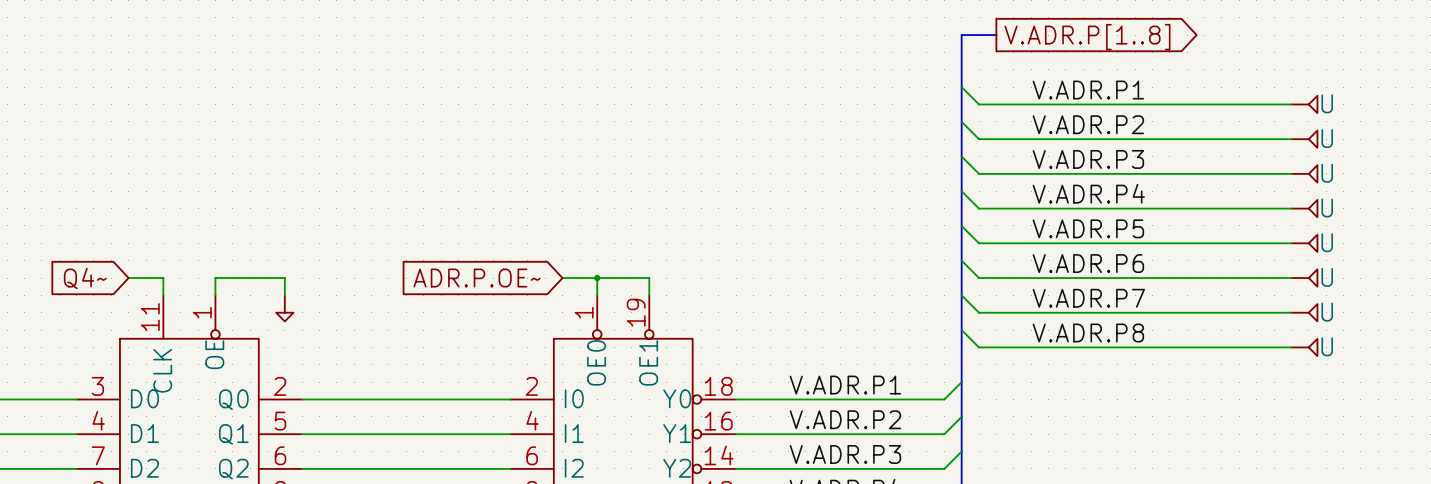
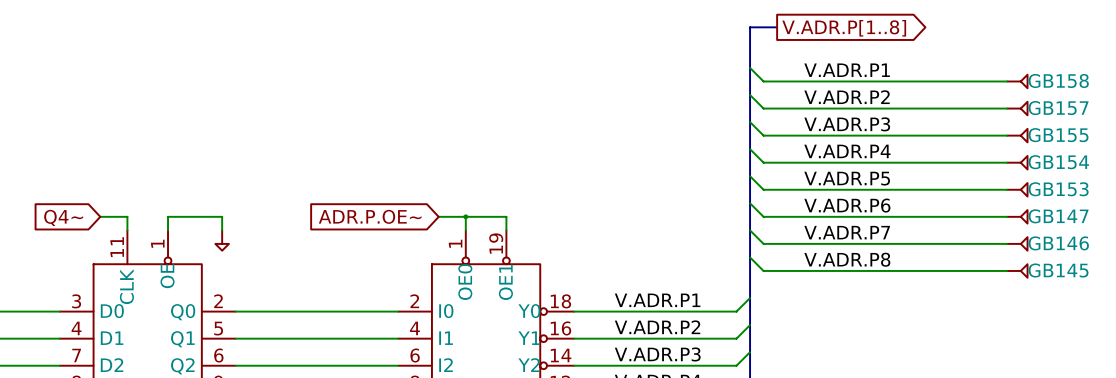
U name: U (1327, 103) -> GB158 (1058, 80)
U name: U (1327, 138) -> GB157 (1058, 108)
U name: U (1327, 173) -> GB155 (1058, 135)
U name: U (1327, 207) -> GB154 (1058, 162)
U name: U (1327, 242) -> GB153 (1058, 189)
U name: U (1327, 277) -> GB147 (1058, 216)
U name: U (1327, 312) -> GB146 (1058, 243)
U name: U (1327, 346) -> GB145 (1058, 270)

